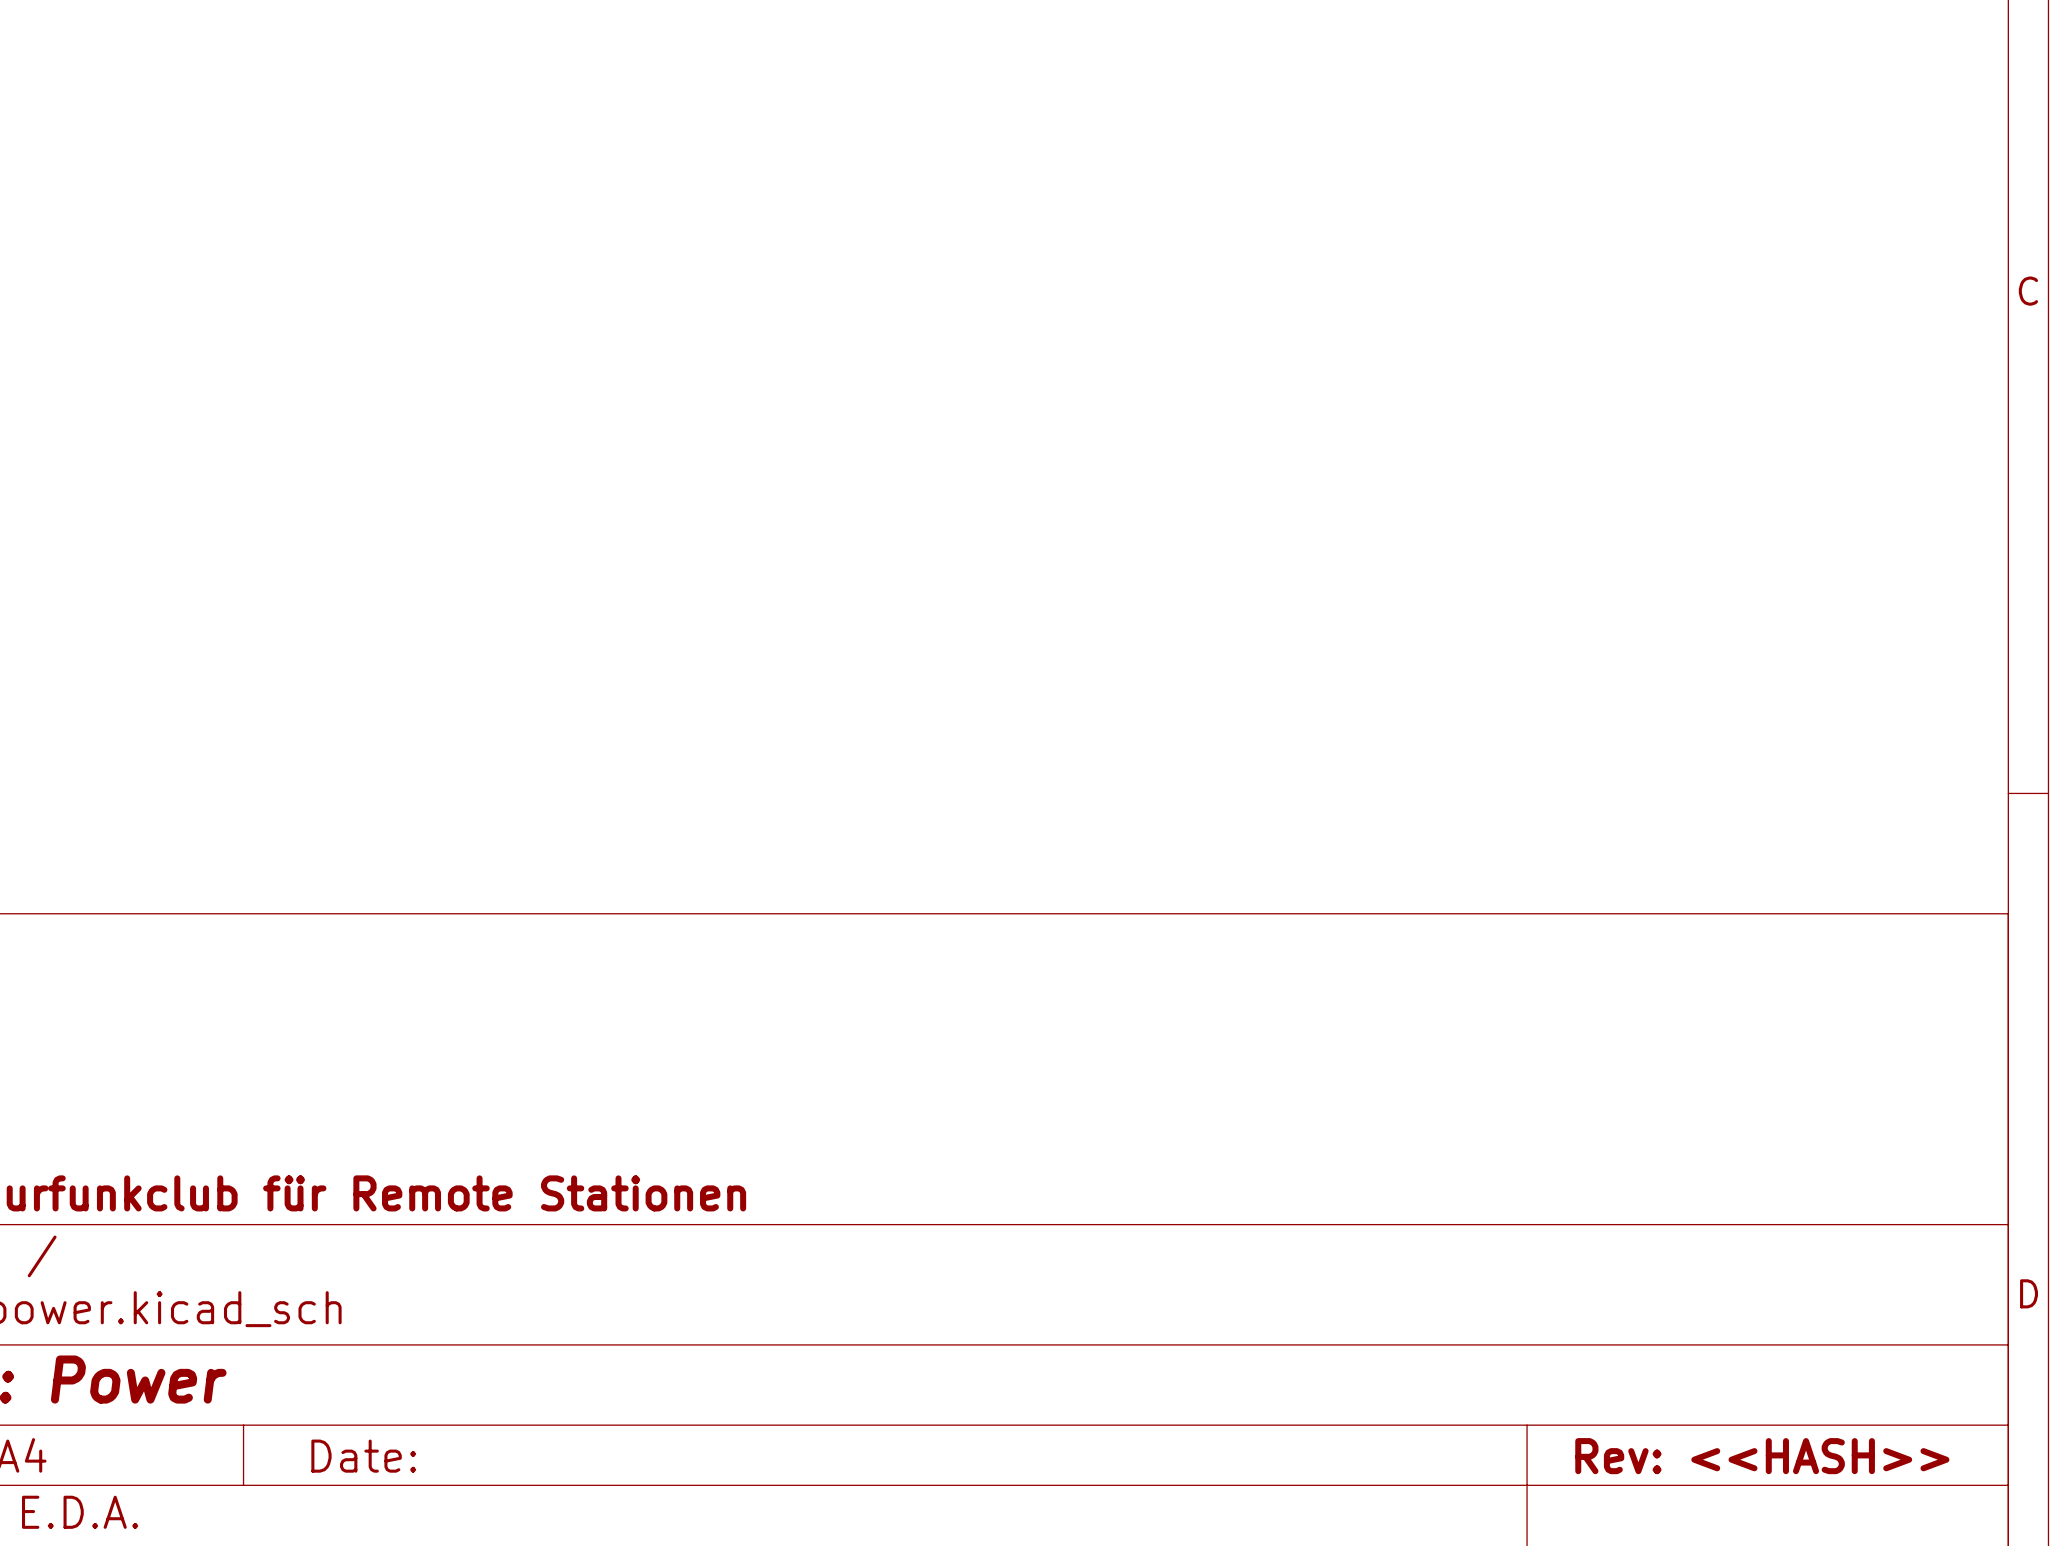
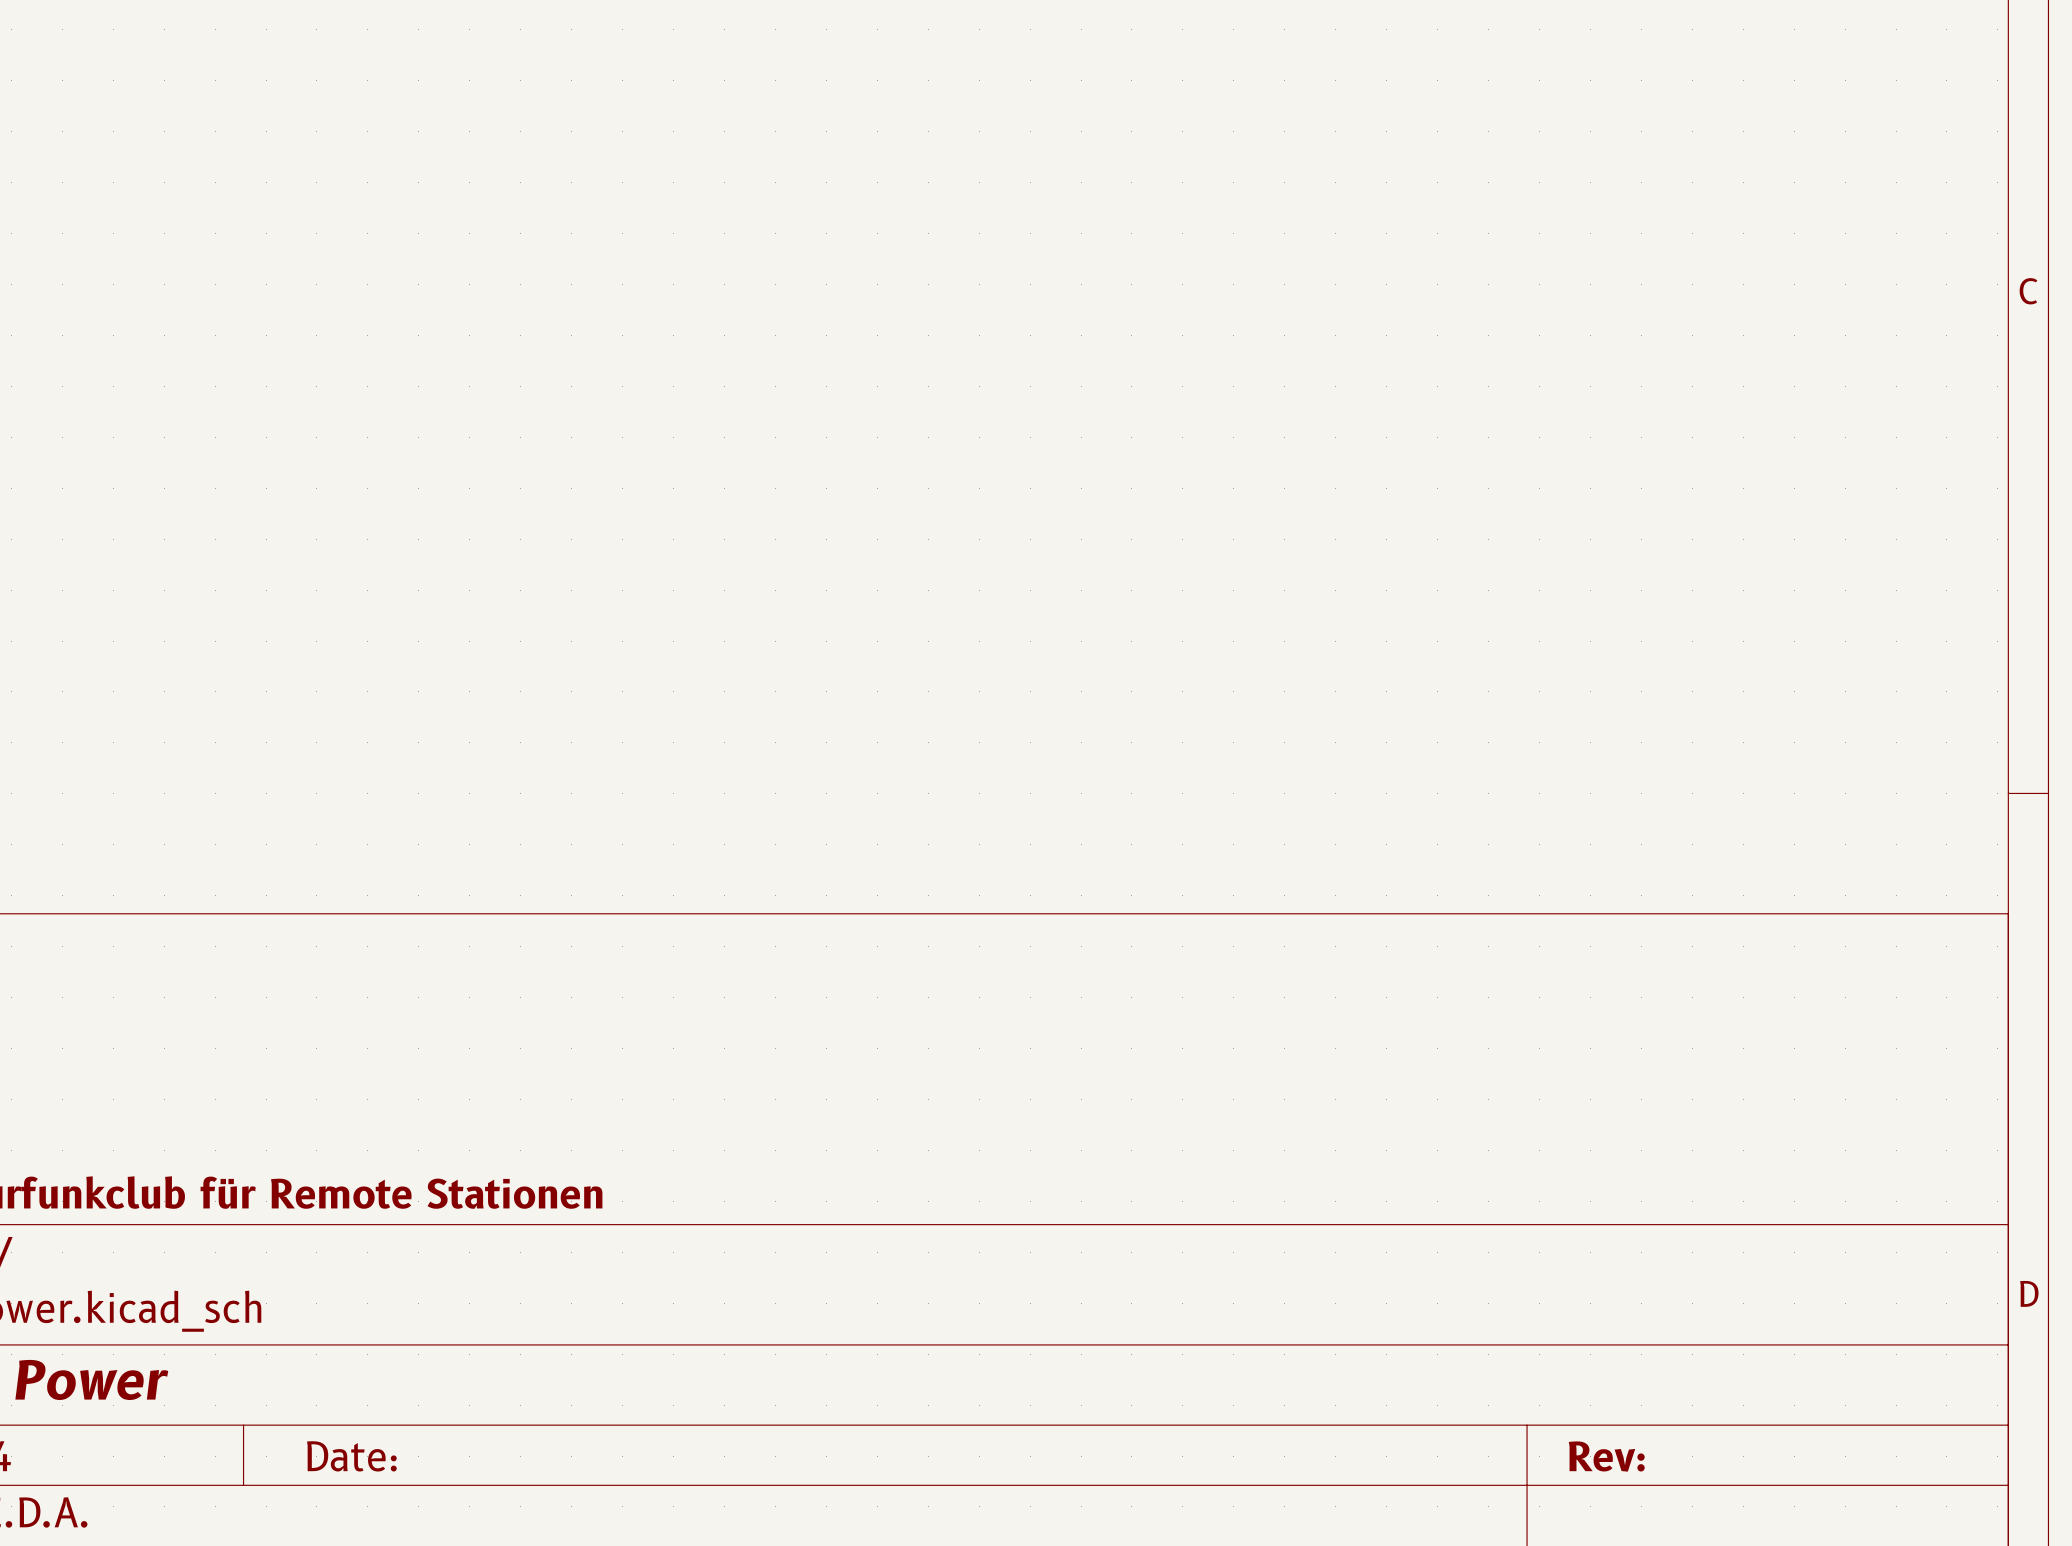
title block: Rev: <<HASH>> (1762, 1456) -> Rev: (1606, 1456)

